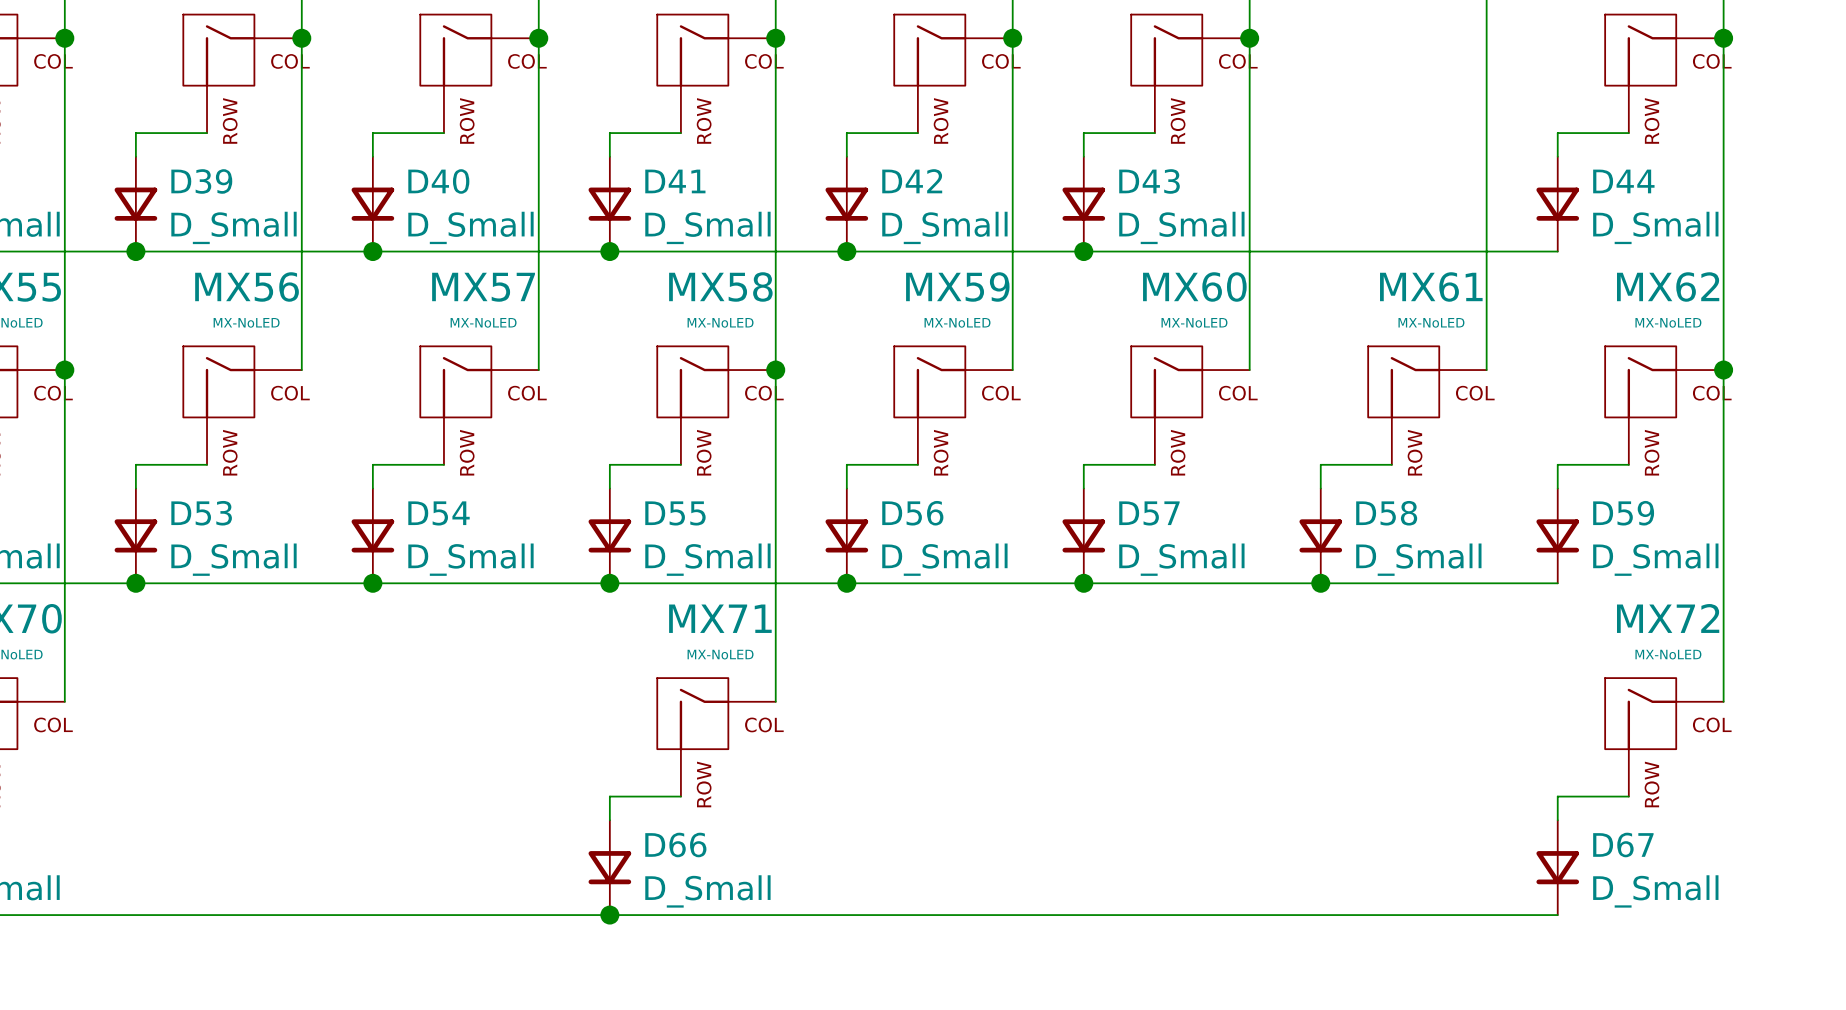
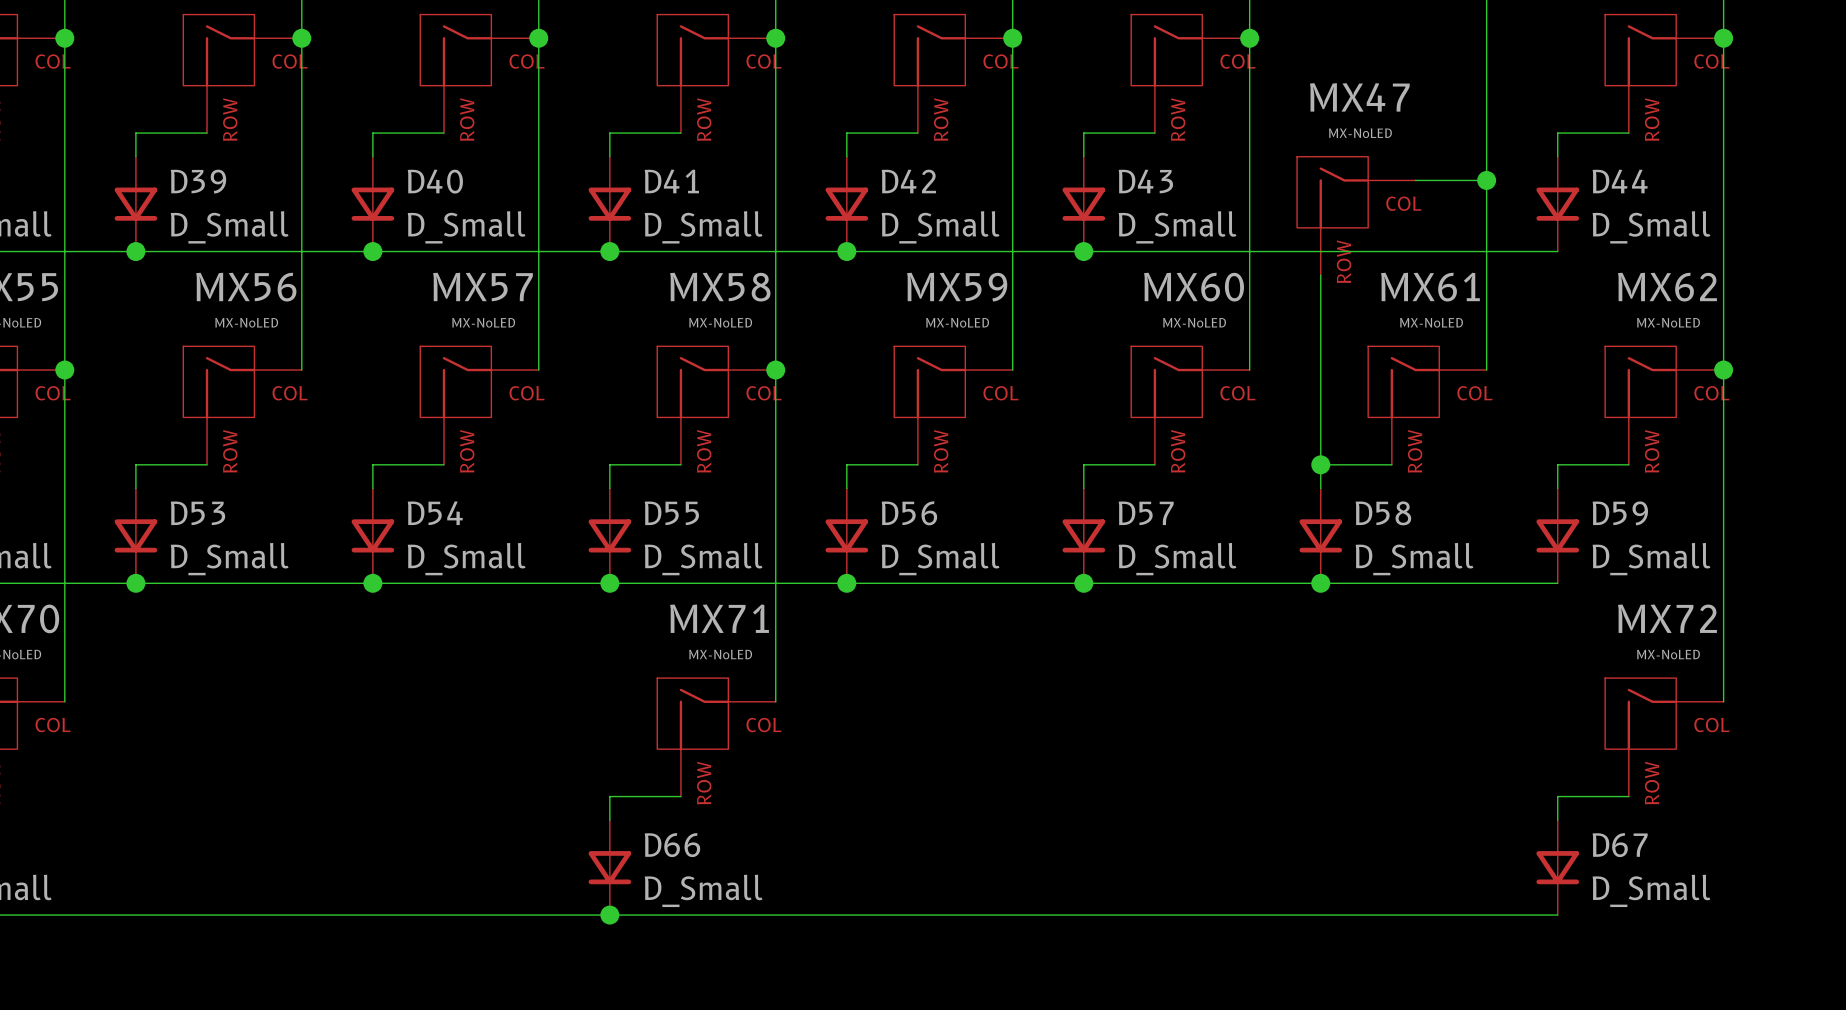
wire: none -> (1415, 180) (1486, 180)
junction: none -> (1486, 180)
MX47: none -> MX-NoLED (1356, 215)
wire: none -> (1320, 275) (1320, 464)
junction: none -> (1320, 464)

